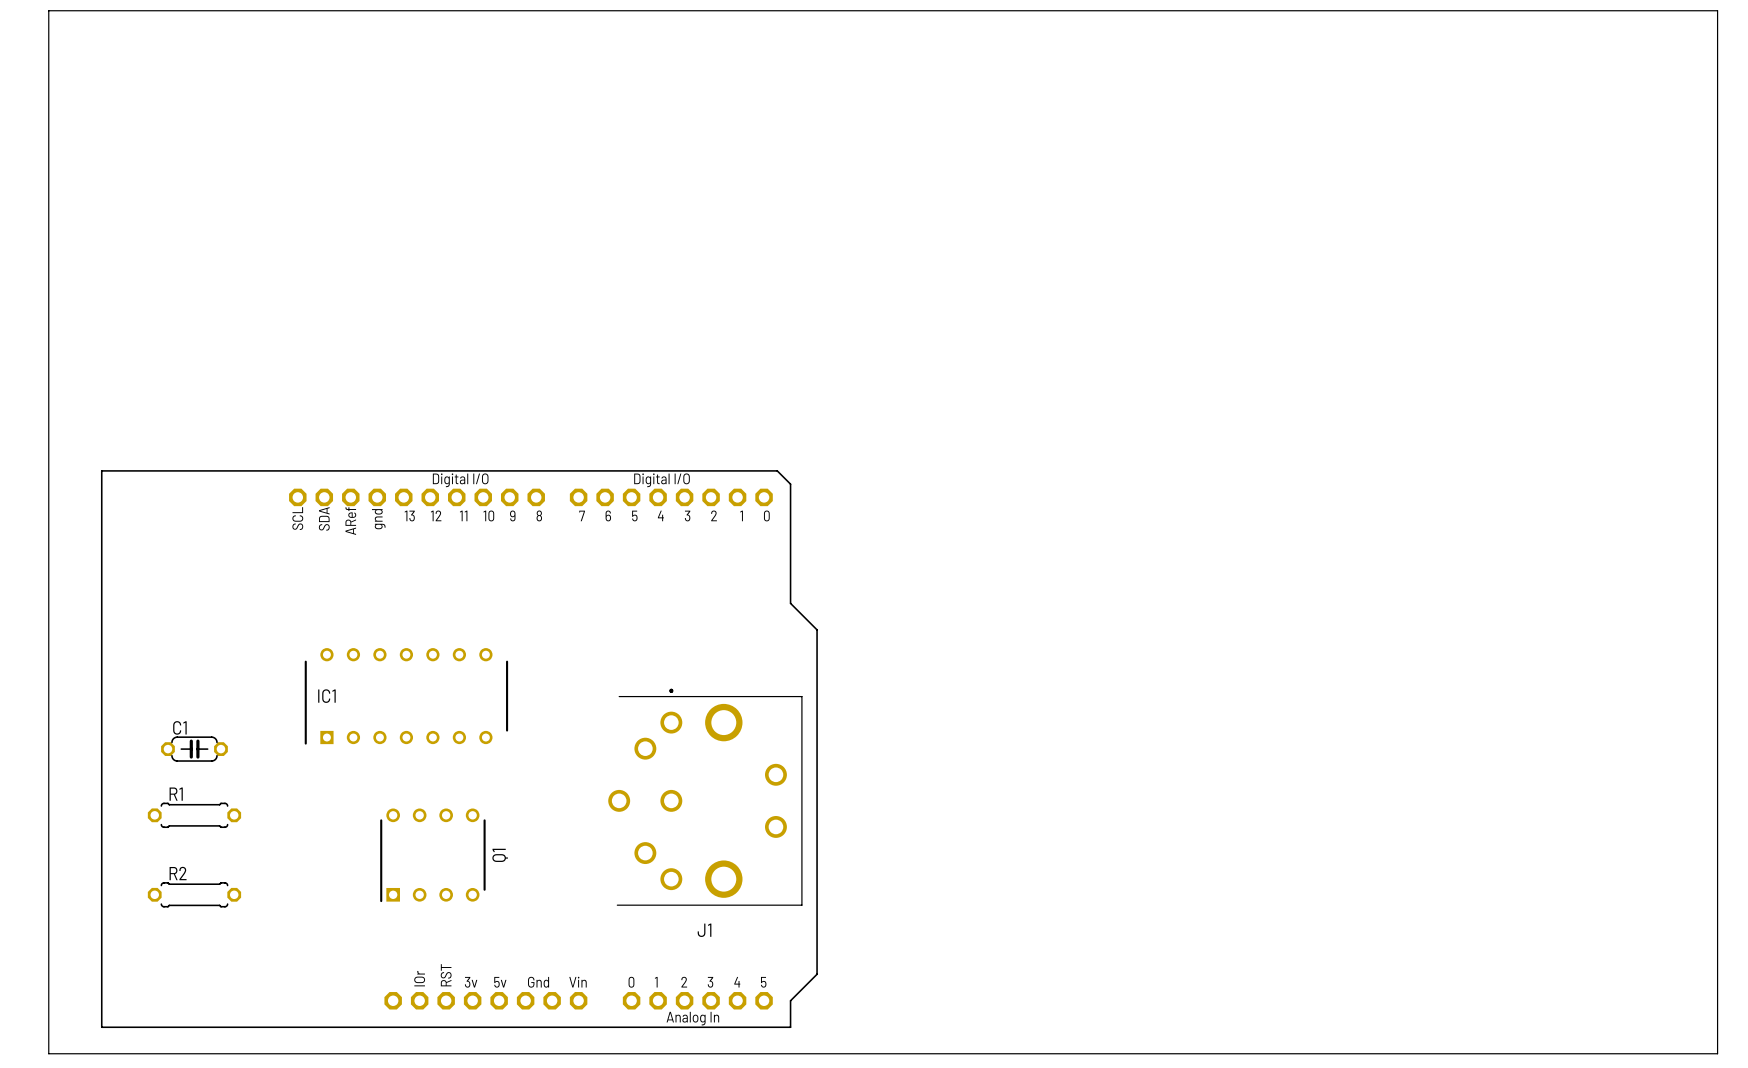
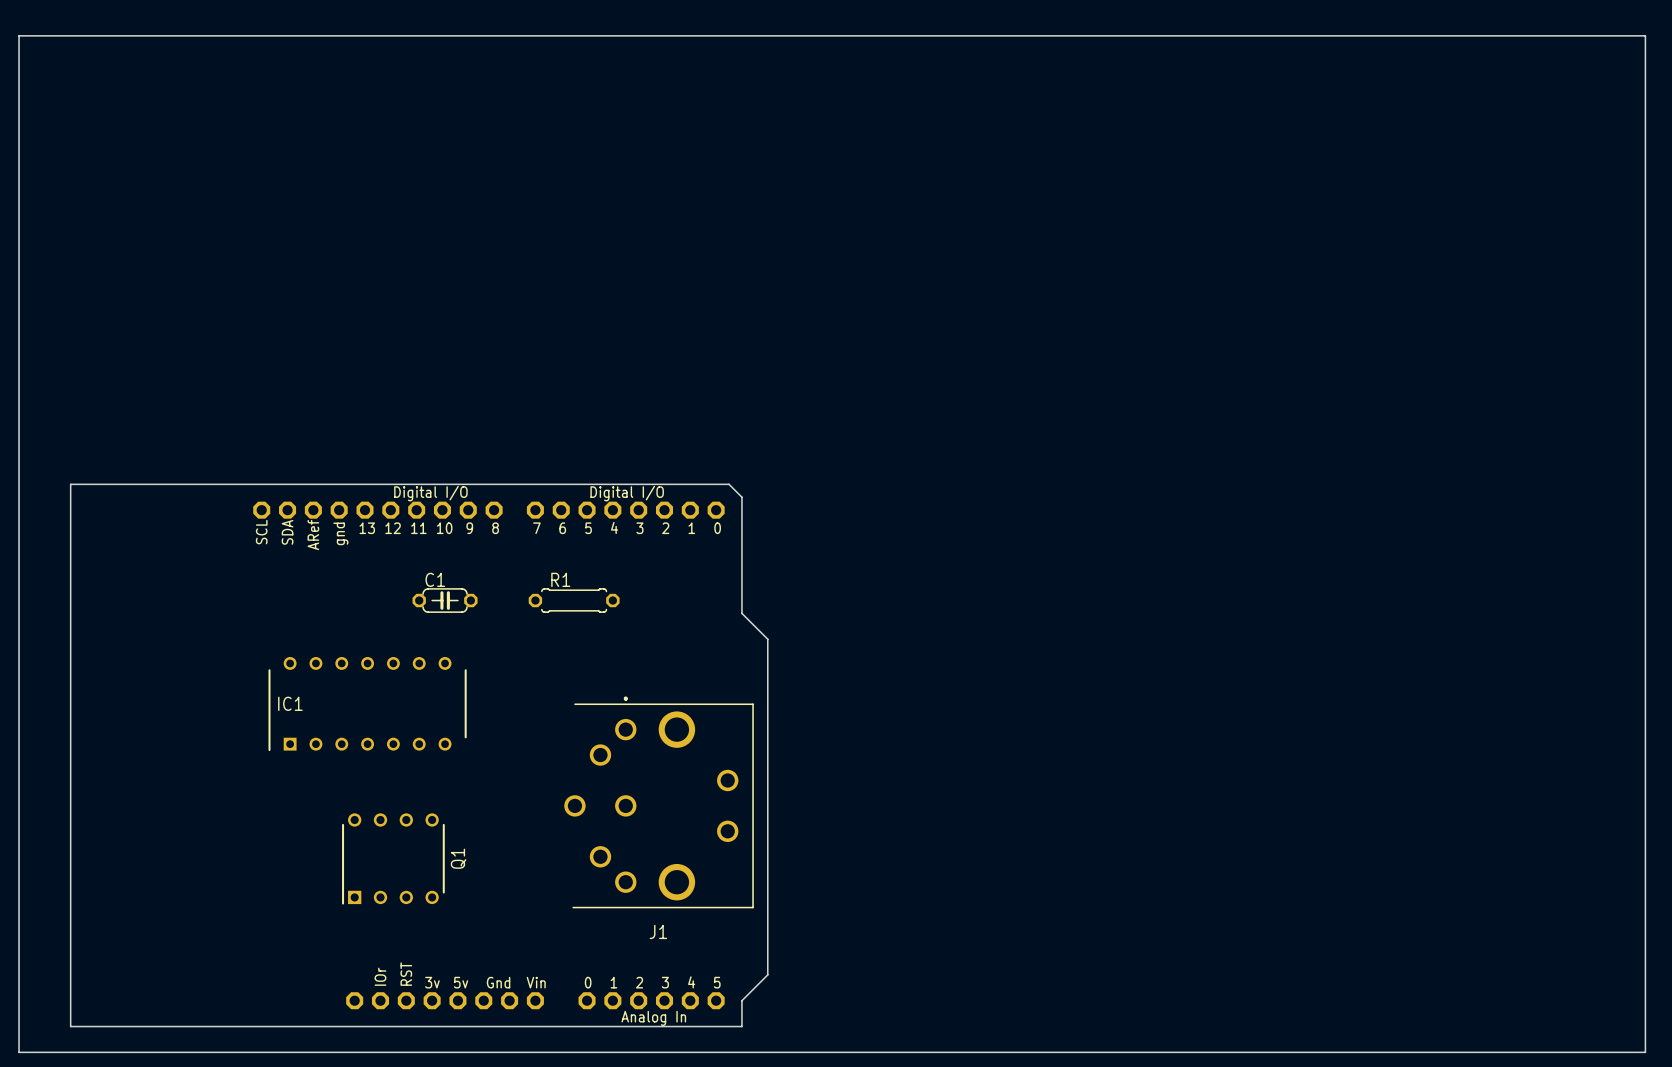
C1 position: (194, 749) -> (445, 600)
R1 position: (194, 815) -> (574, 600)
R2: (194, 894) -> none

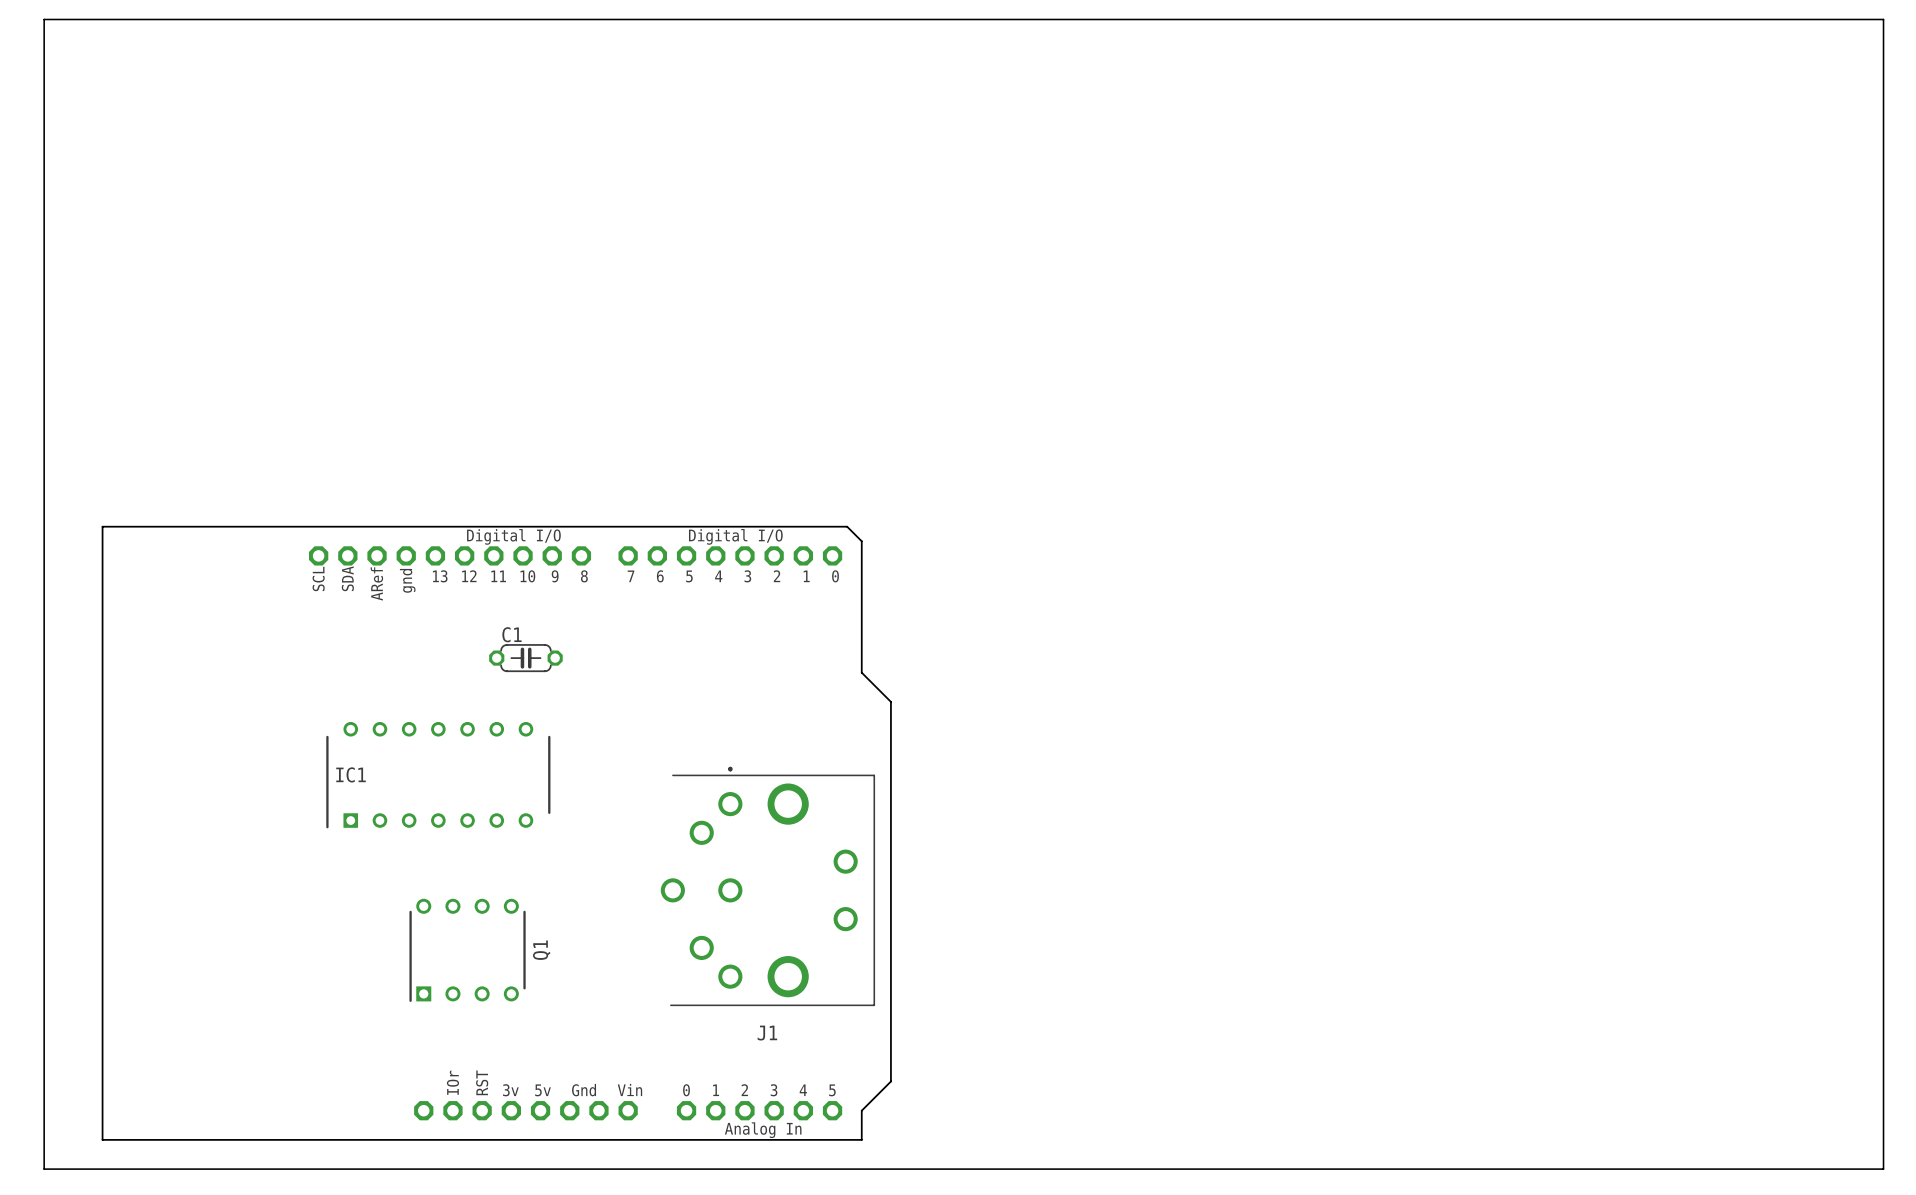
R1: (574, 600) -> none

